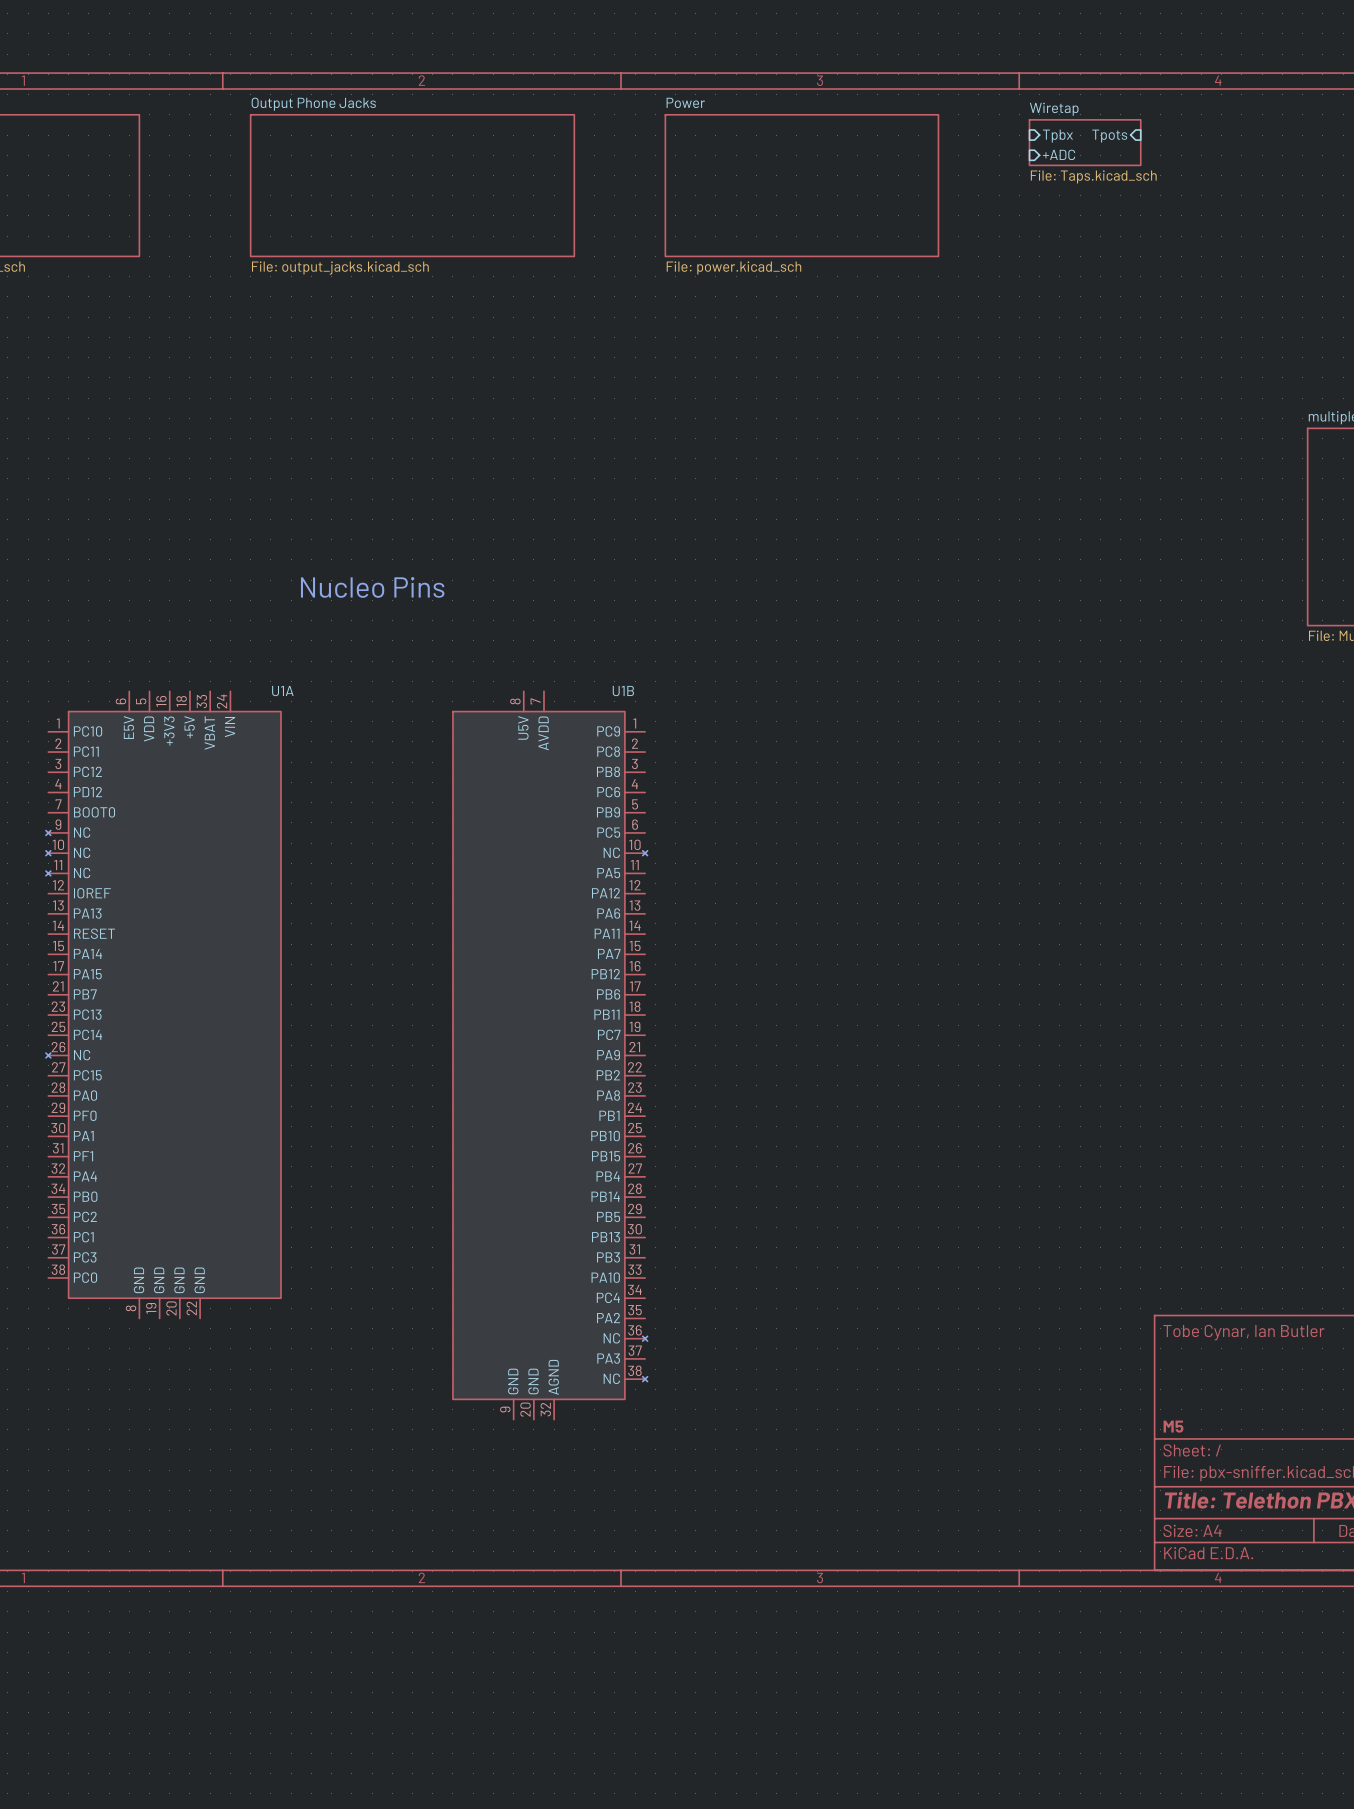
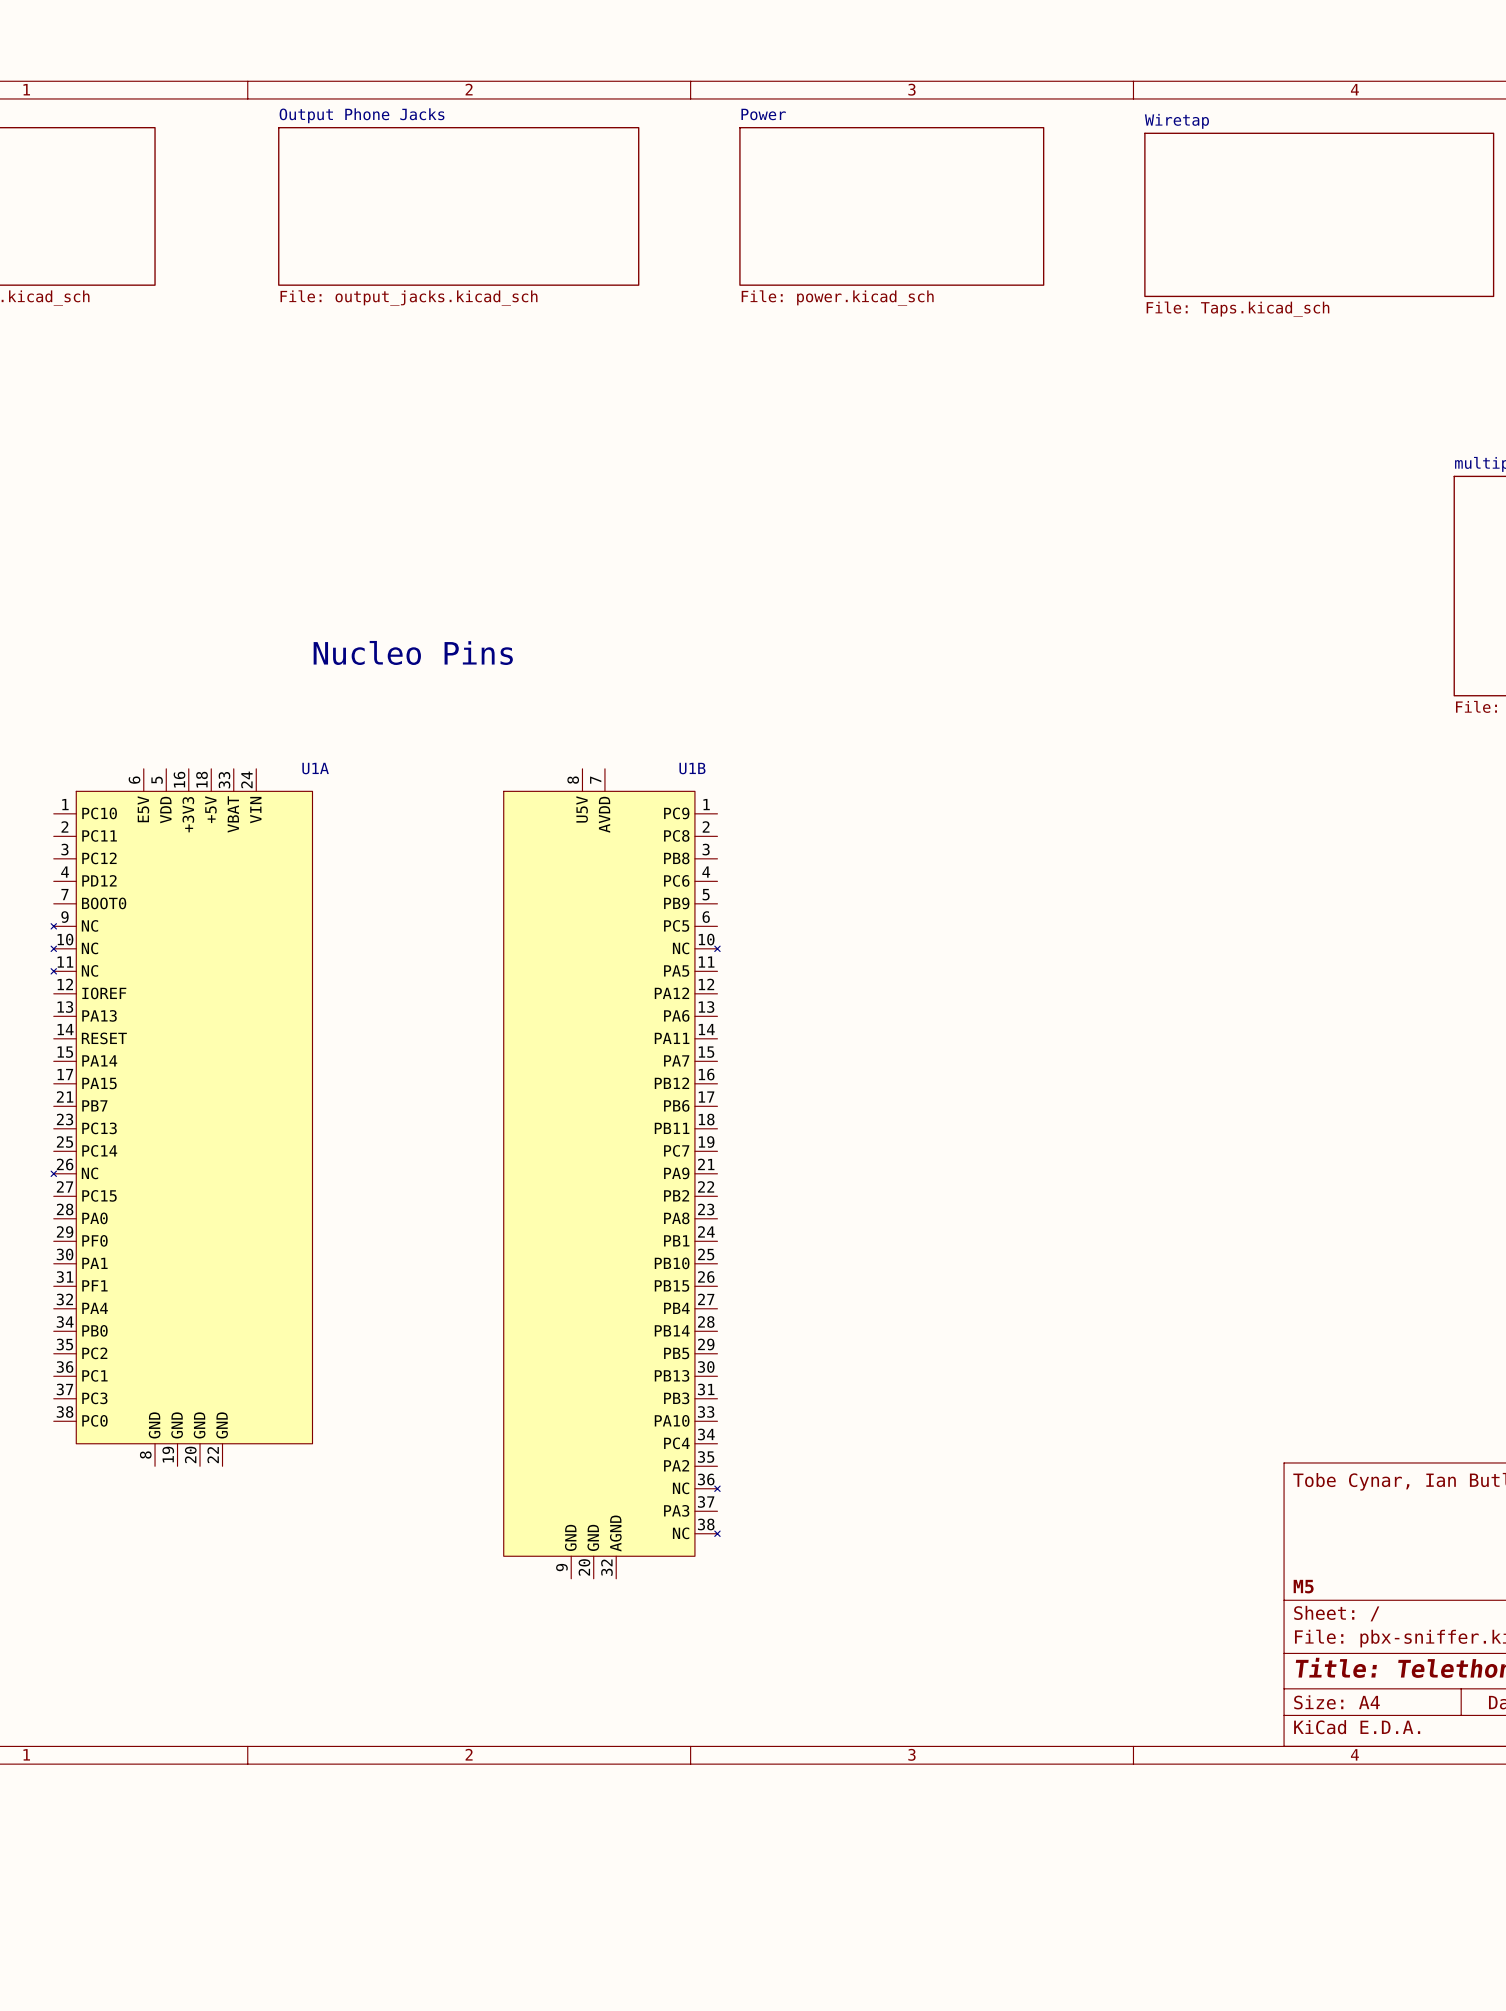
sheet pin: Tpbx (1057, 136) -> none
sheet pin: Tpots (1109, 136) -> none
sheet Wiretap: File: Taps.kicad_sch (1085, 142) -> none
sheet pin: +ADC (1058, 154) -> none
sheet Wiretap: none -> File: Taps.kicad_sch (1319, 214)

